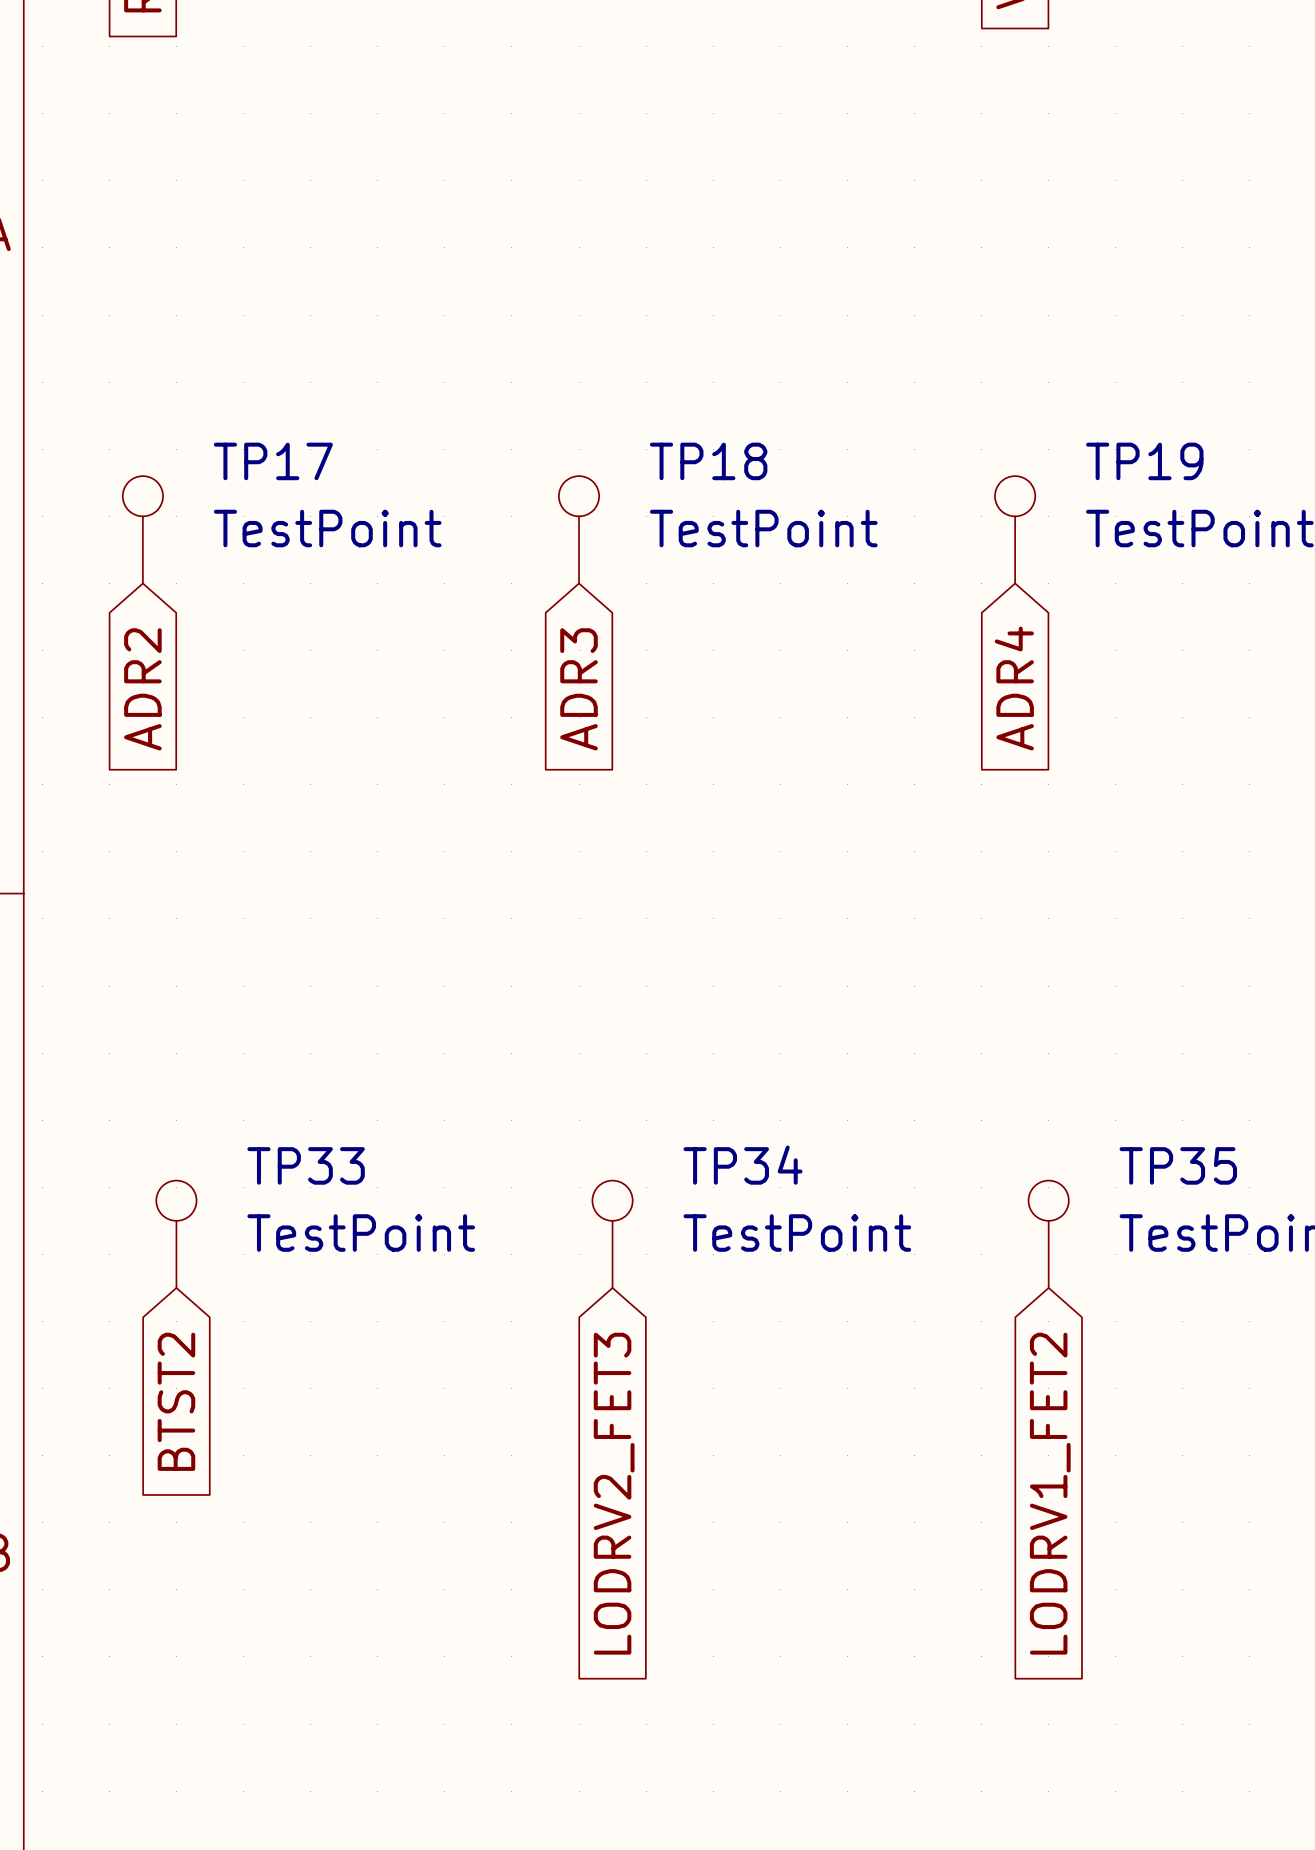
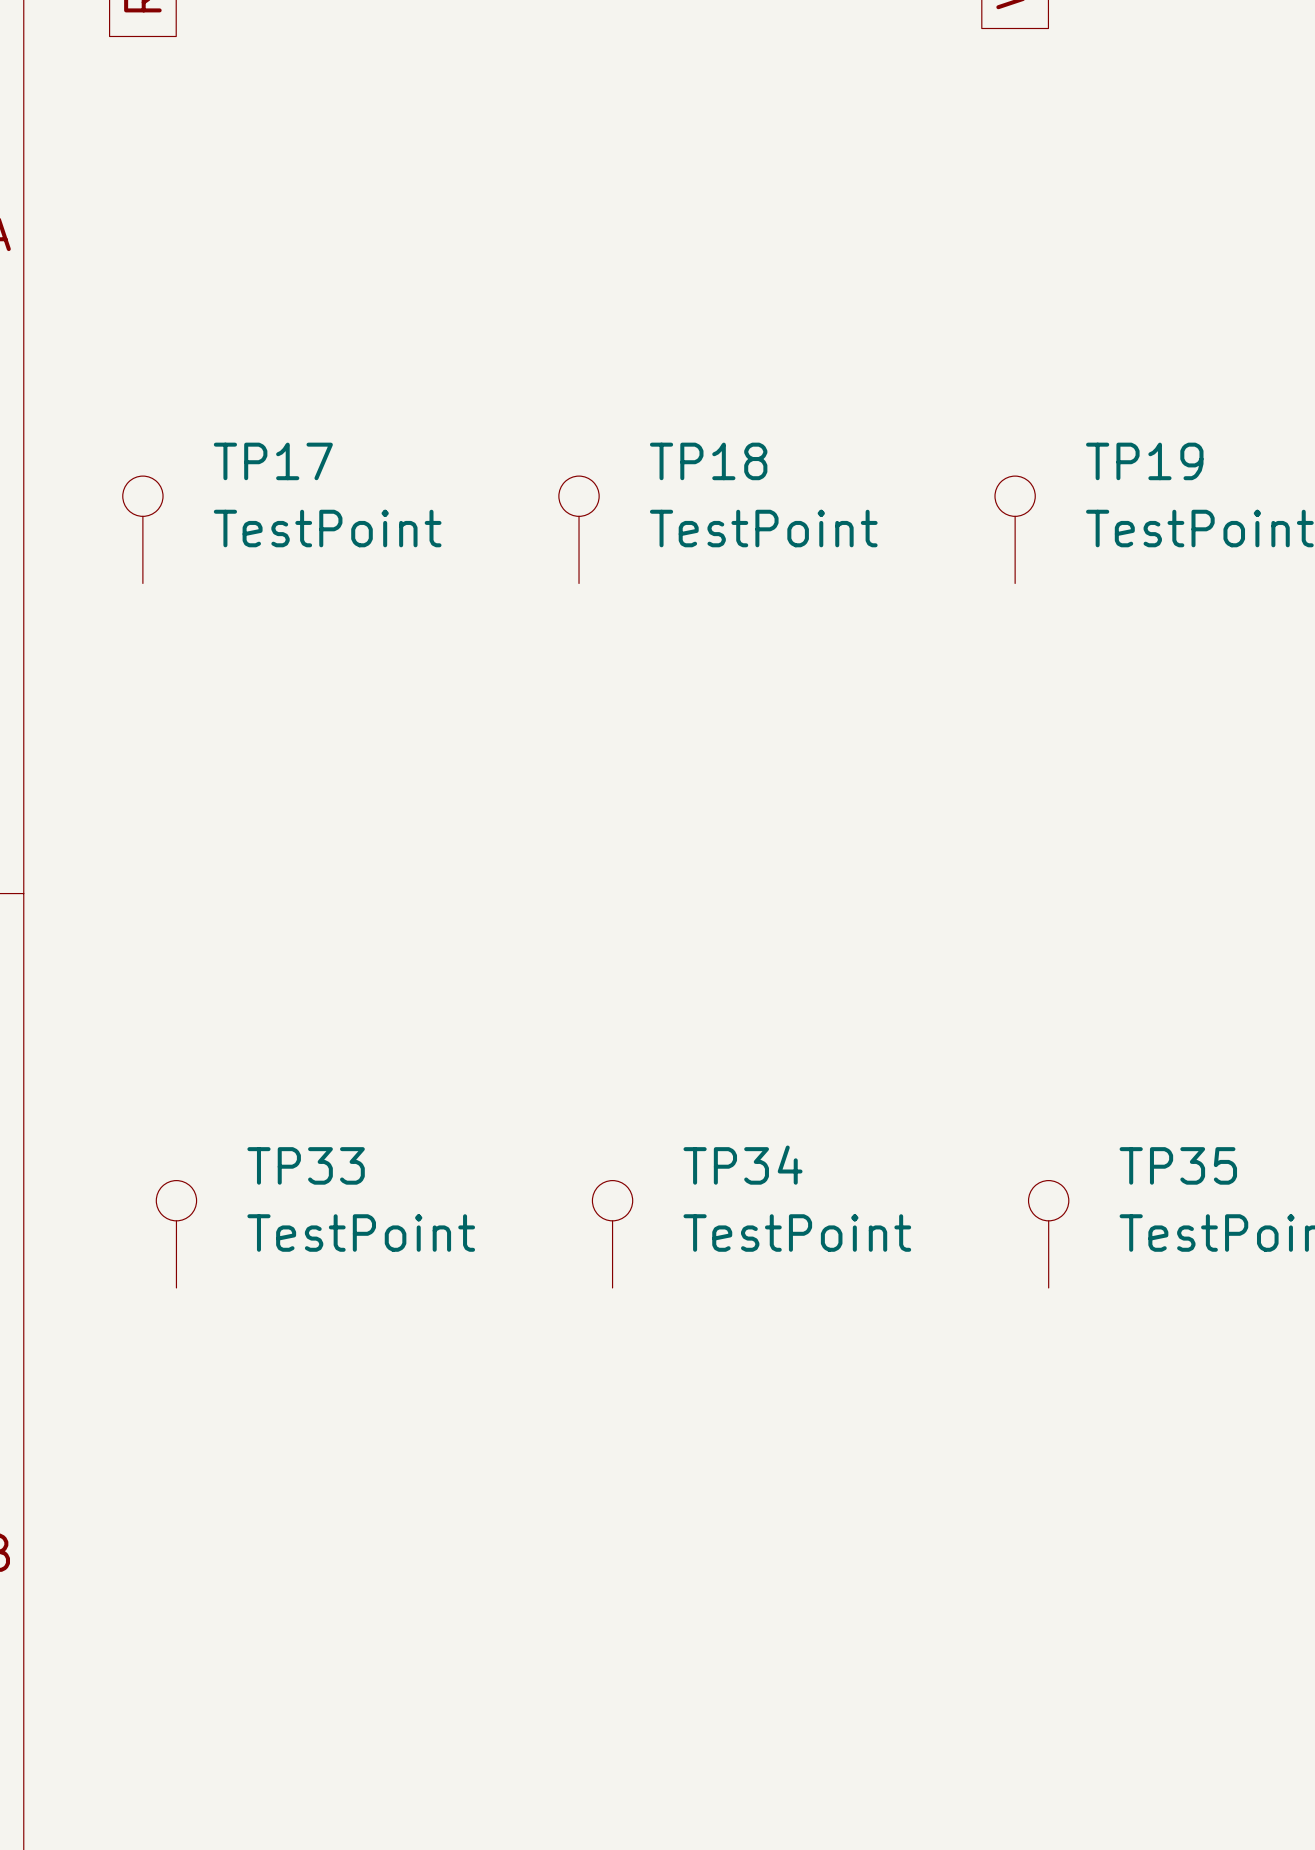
global label: ADR4 (1014, 688) -> none
global label: ADR2 (142, 689) -> none
global label: ADR3 (579, 689) -> none
global label: BTST2 (176, 1401) -> none
global label: LODRV2_FET3 (614, 1493) -> none
global label: LODRV1_FET2 (1050, 1493) -> none

